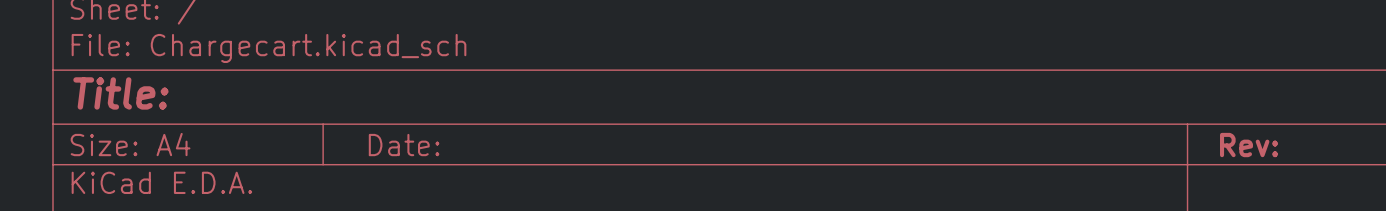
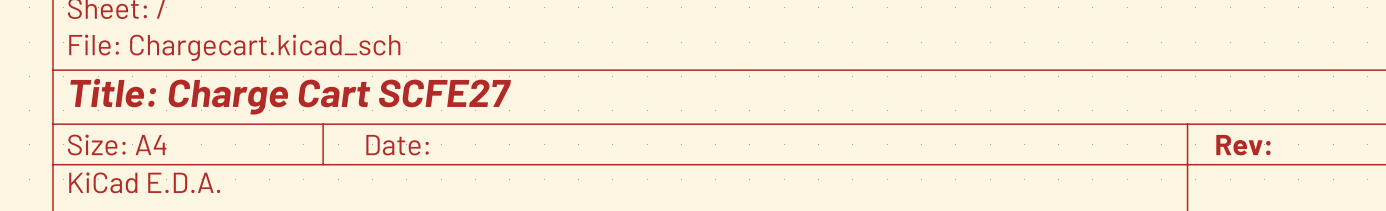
title block: Title: (120, 93) -> Title: Charge Cart SCFE27 (290, 96)

